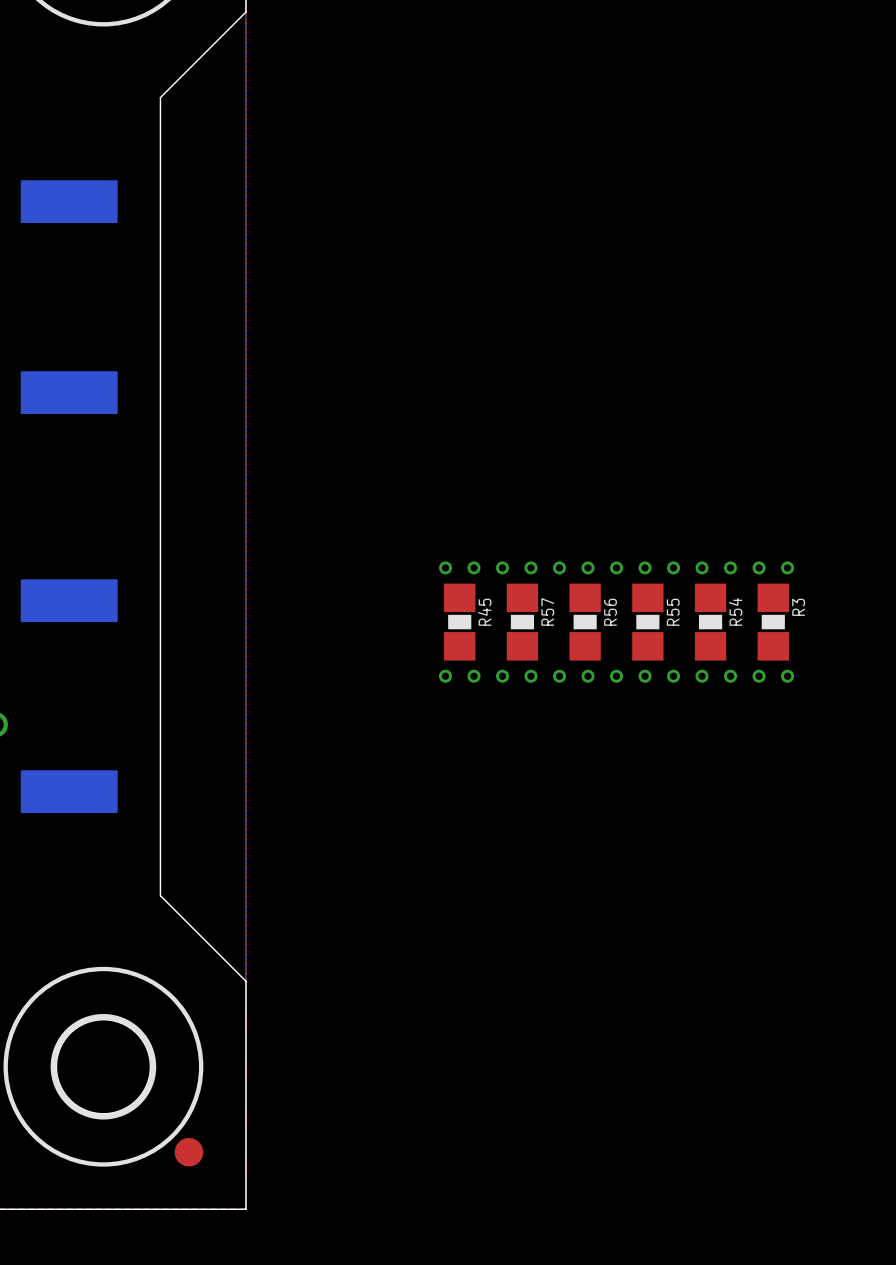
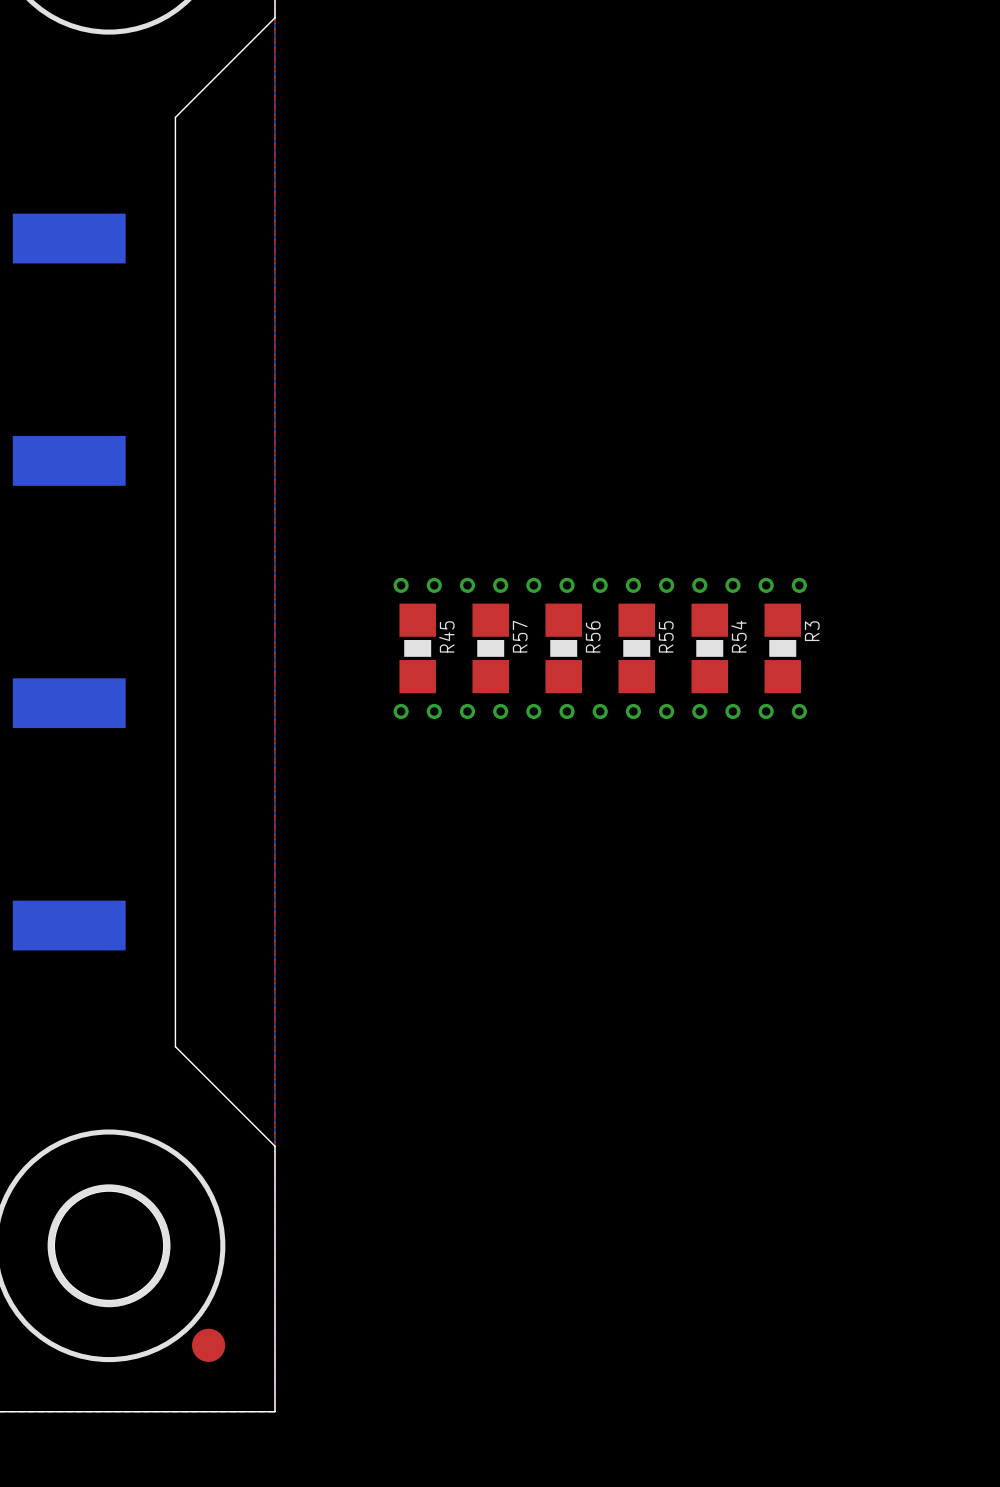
via: none -> (401, 585)
via: none -> (434, 585)
via: none -> (467, 585)
via: none -> (500, 585)
via: none -> (533, 585)
via: none -> (567, 585)
via: none -> (600, 585)
via: none -> (633, 585)
via: none -> (666, 585)
via: none -> (699, 585)
via: none -> (732, 585)
via: none -> (766, 585)
via: none -> (799, 585)
via: (445, 567) -> none
via: (473, 567) -> none
via: (502, 567) -> none
via: (531, 567) -> none
via: (559, 567) -> none
via: (588, 567) -> none
via: (616, 567) -> none
via: (645, 567) -> none
via: (673, 567) -> none
via: (702, 567) -> none
via: (730, 567) -> none
via: (759, 567) -> none
via: (787, 567) -> none
via: none -> (401, 711)
via: none -> (434, 711)
via: none -> (467, 711)
via: none -> (500, 711)
via: none -> (533, 711)
via: none -> (567, 711)
via: none -> (600, 711)
via: none -> (633, 711)
via: none -> (666, 711)
via: none -> (699, 711)
via: none -> (732, 711)
via: none -> (766, 711)
via: none -> (799, 711)
R45 position: (459, 622) -> (417, 648)
R57 position: (522, 622) -> (490, 648)
R56 position: (585, 622) -> (563, 648)
R55 position: (647, 622) -> (636, 648)
R54 position: (710, 622) -> (709, 648)
R3 position: (773, 622) -> (782, 648)
via: (445, 676) -> none
via: (473, 676) -> none
via: (502, 676) -> none
via: (531, 676) -> none
via: (559, 676) -> none
via: (588, 676) -> none
via: (616, 676) -> none
via: (645, 676) -> none
via: (673, 676) -> none
via: (702, 676) -> none
via: (730, 676) -> none
via: (759, 676) -> none
via: (787, 676) -> none

